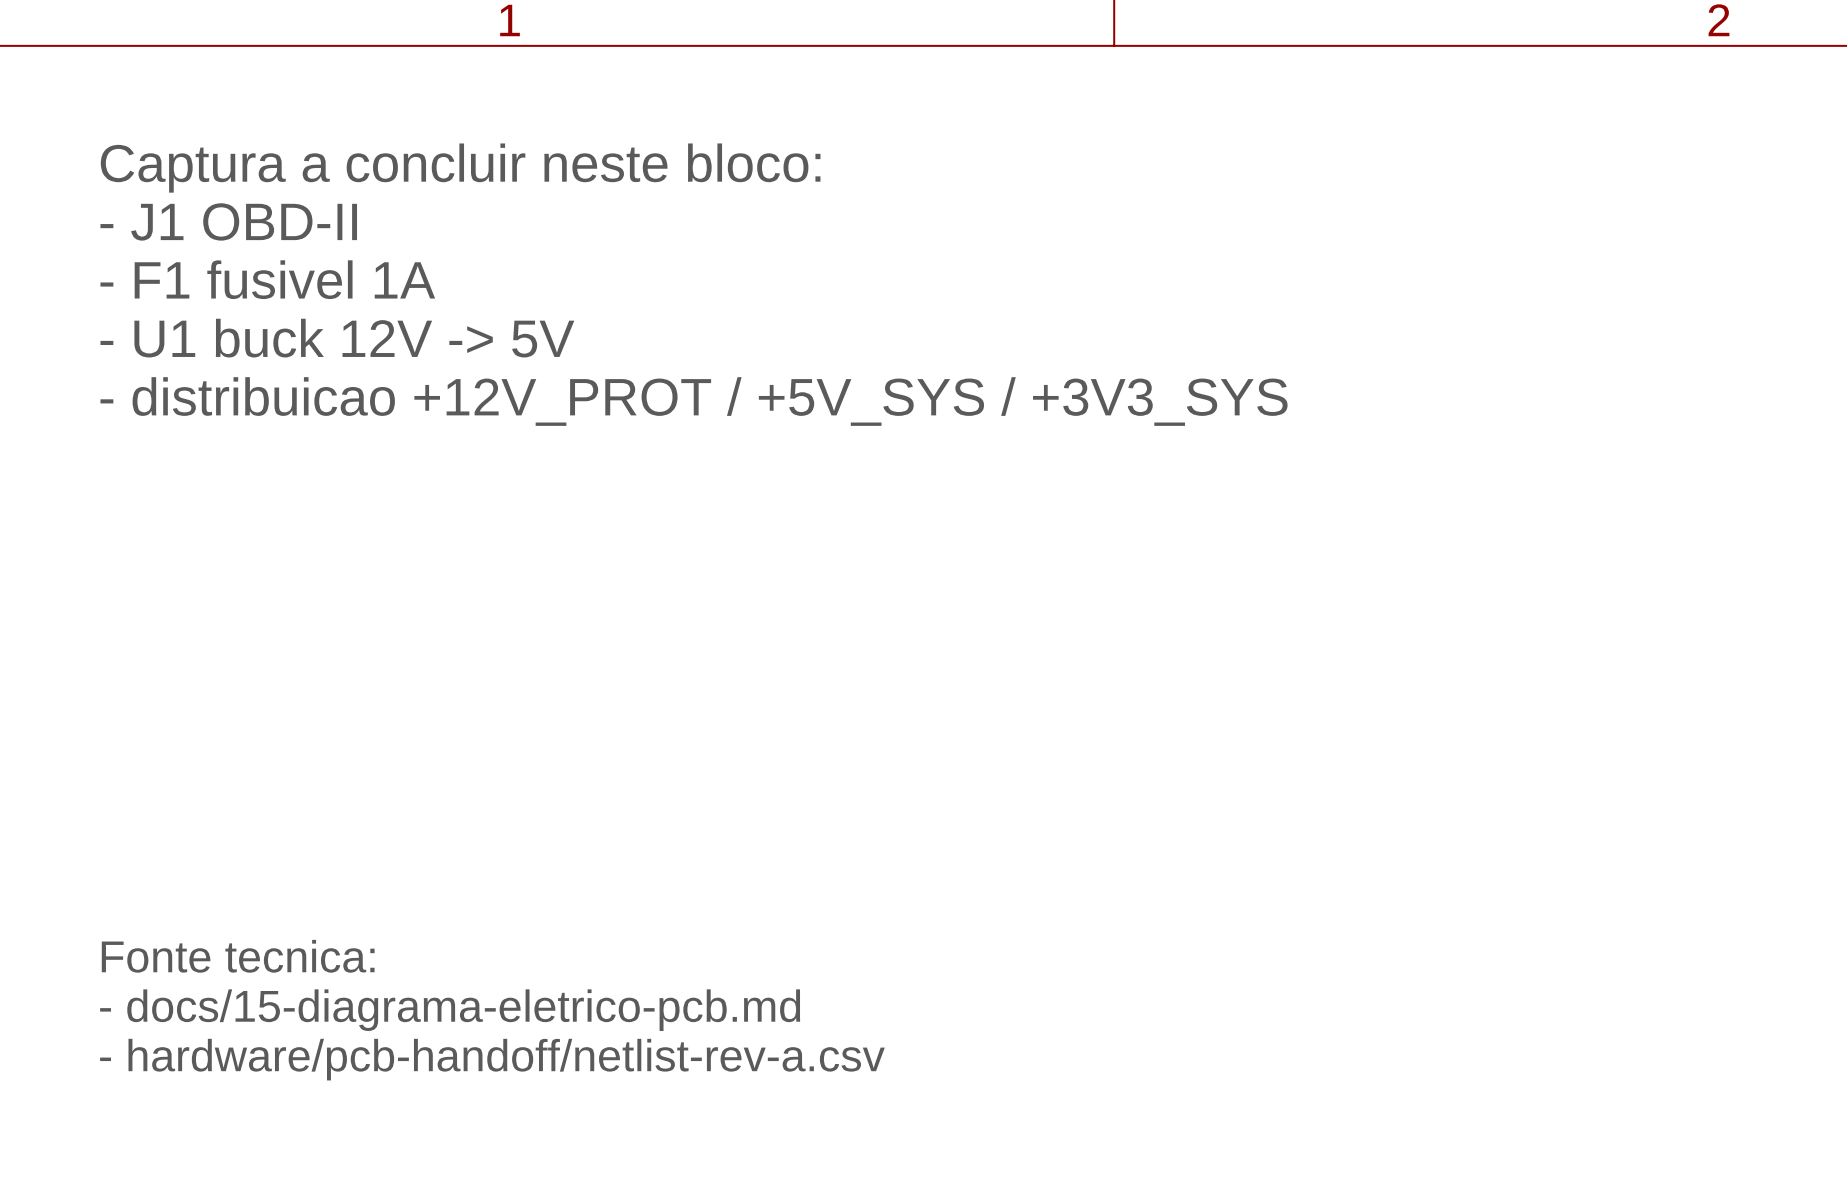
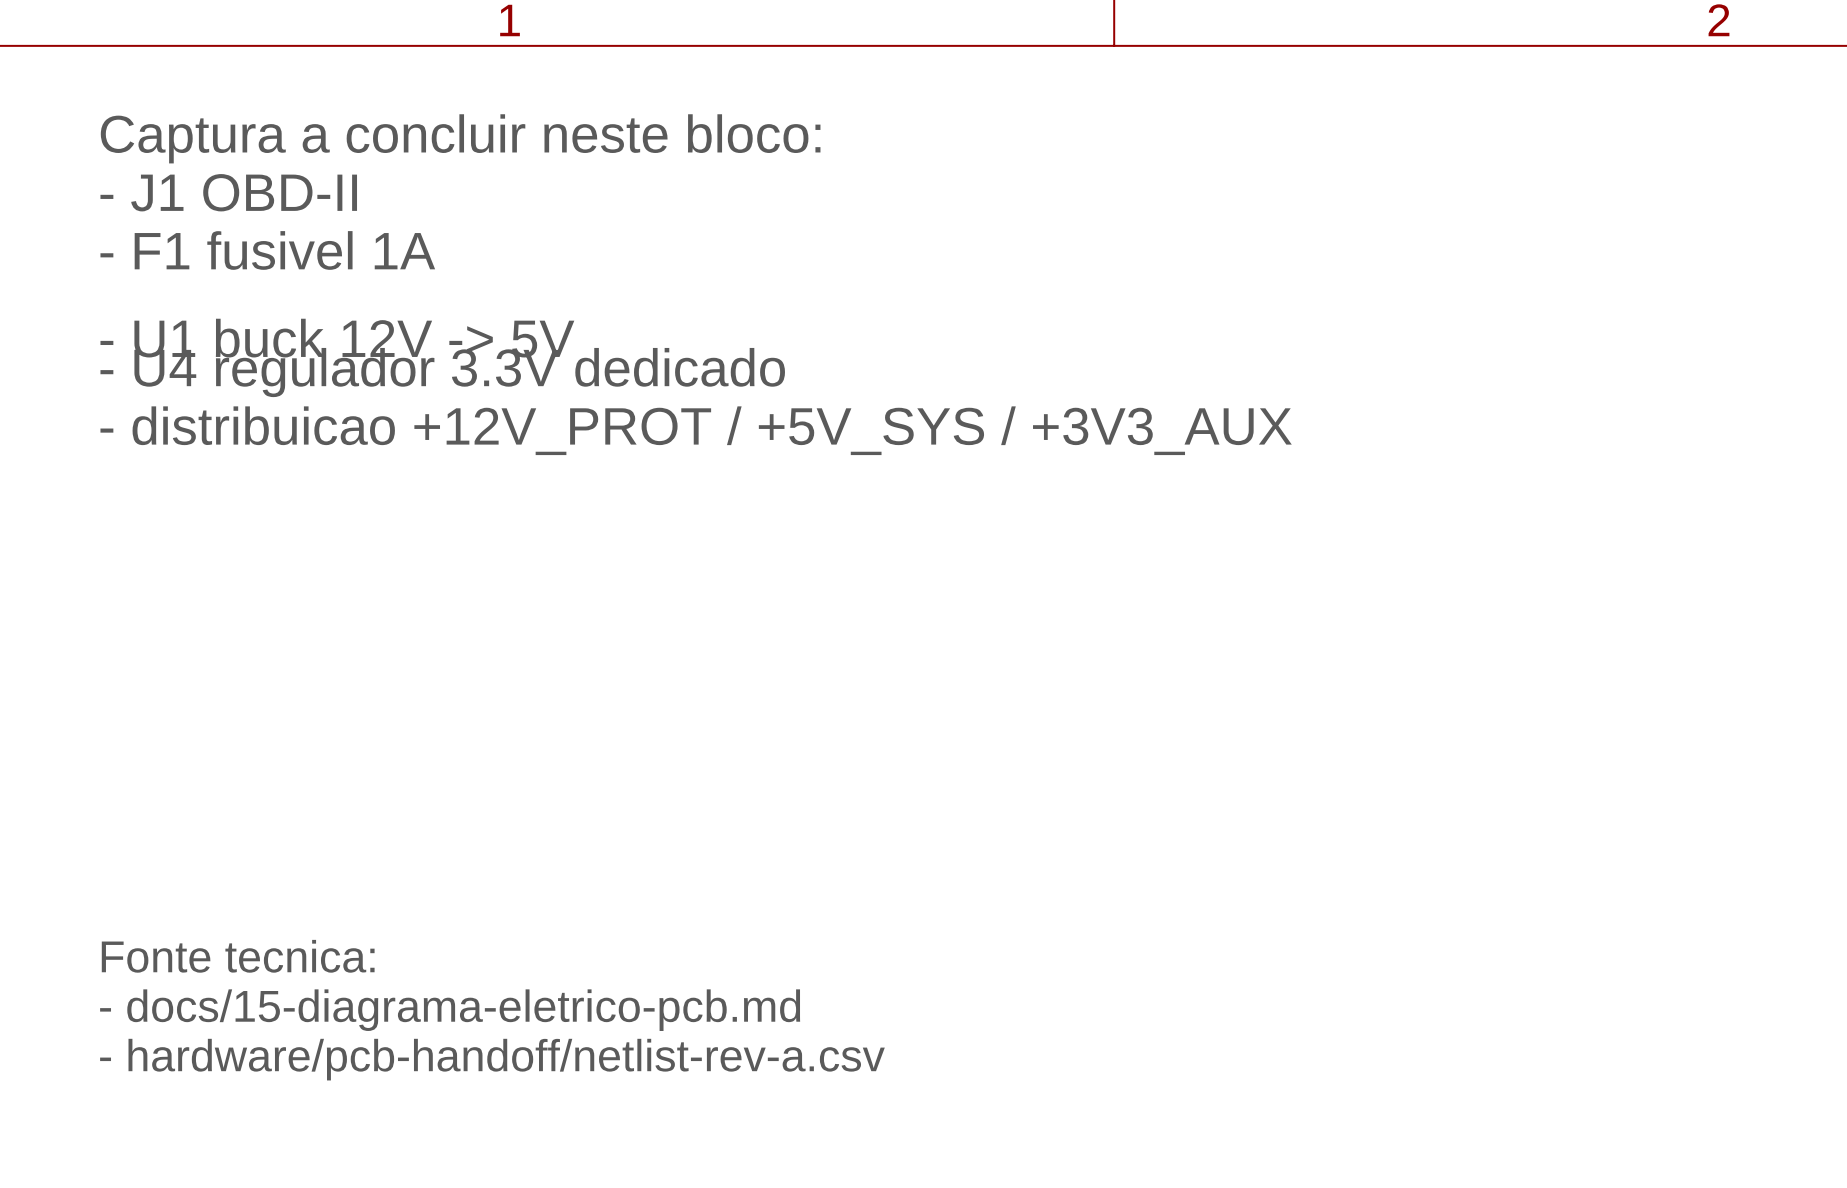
text position: Captura a concluir neste bloco: (460, 168) -> Captura a concluir neste bloco: (460, 138)
text position: - J1 OBD-II (228, 221) -> - J1 OBD-II (228, 192)
text position: - F1 fusivel 1A (267, 279) -> - F1 fusivel 1A (267, 250)
text: none -> - U4 regulador 3.3V dedicado (442, 372)
text: - distribuicao +12V_PROT / +5V_SYS / +3V3_SYS (694, 401) -> - distribuicao +12V_PROT / +5V_SYS / +3V3_AUX (696, 430)

